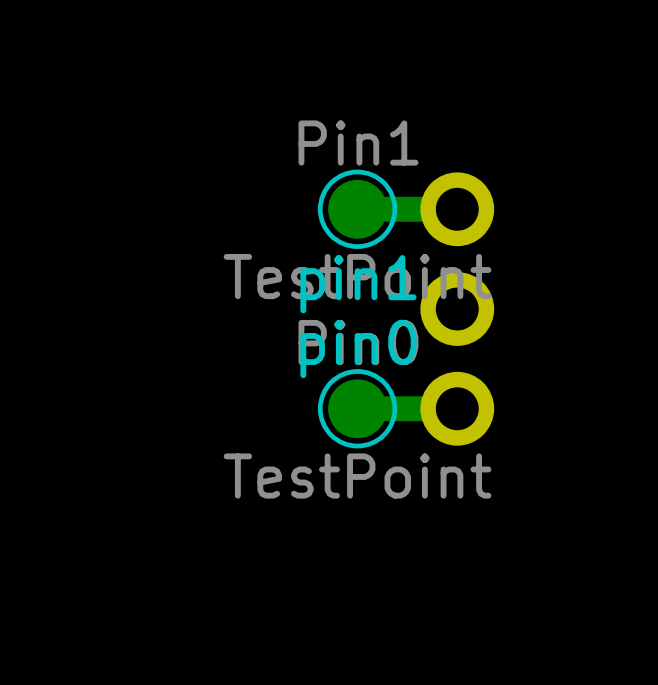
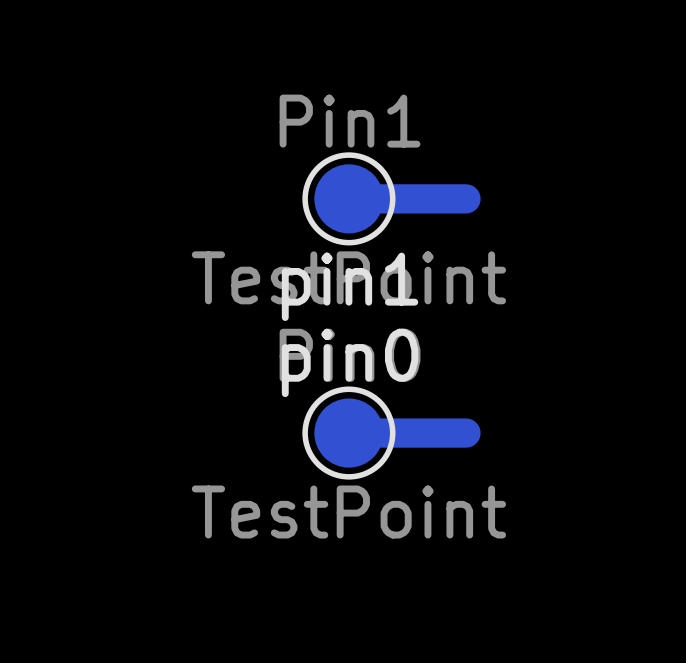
part: (457, 309) -> none

